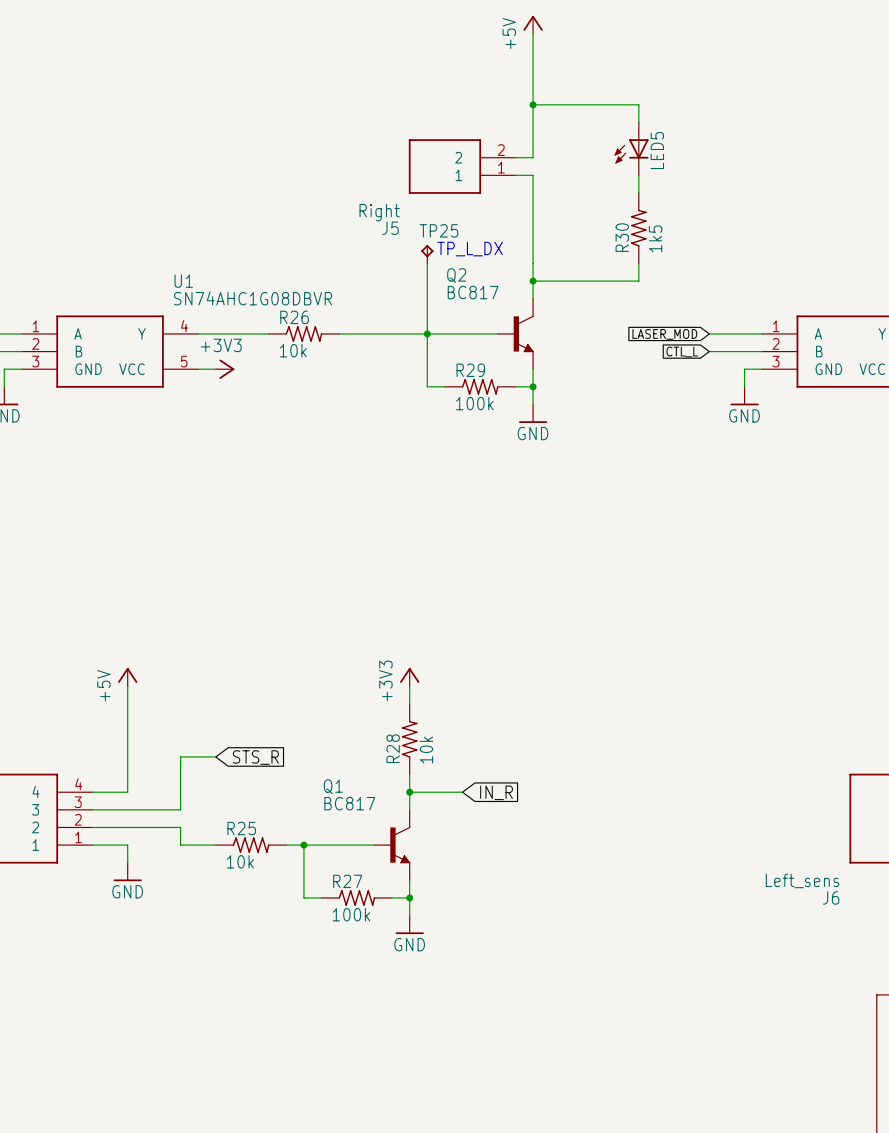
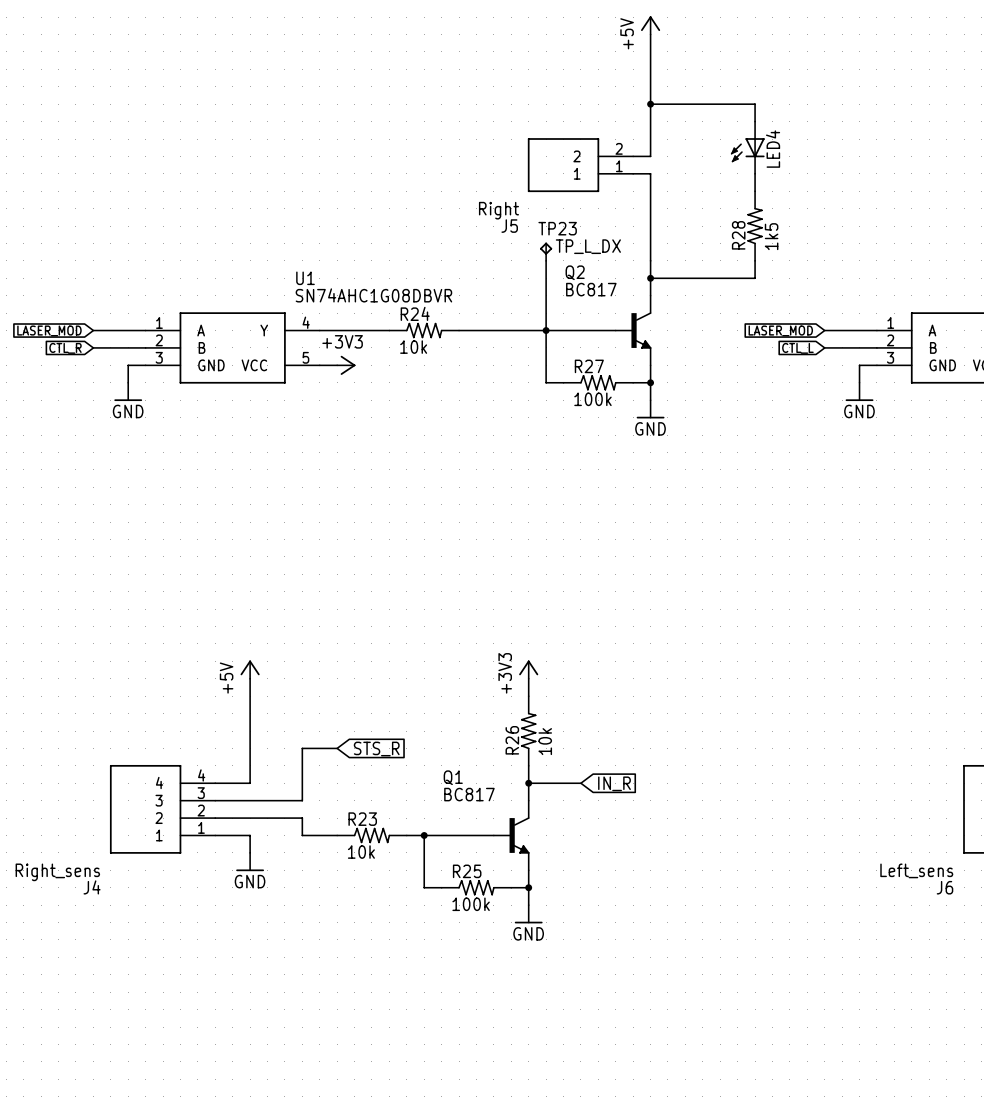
LED5 name: LED5 (657, 150) -> LED4 (773, 149)
TP25 name: TP25 (438, 230) -> TP23 (557, 228)
R30 name: R30 (622, 237) -> R28 (738, 235)
R26 name: R26 (294, 317) -> R24 (415, 313)
R29 name: R29 (470, 370) -> R27 (589, 366)
R28 name: R28 (393, 748) -> R26 (512, 740)
R25 name: R25 (241, 828) -> R23 (362, 819)
R27 name: R27 (347, 881) -> R25 (467, 871)

